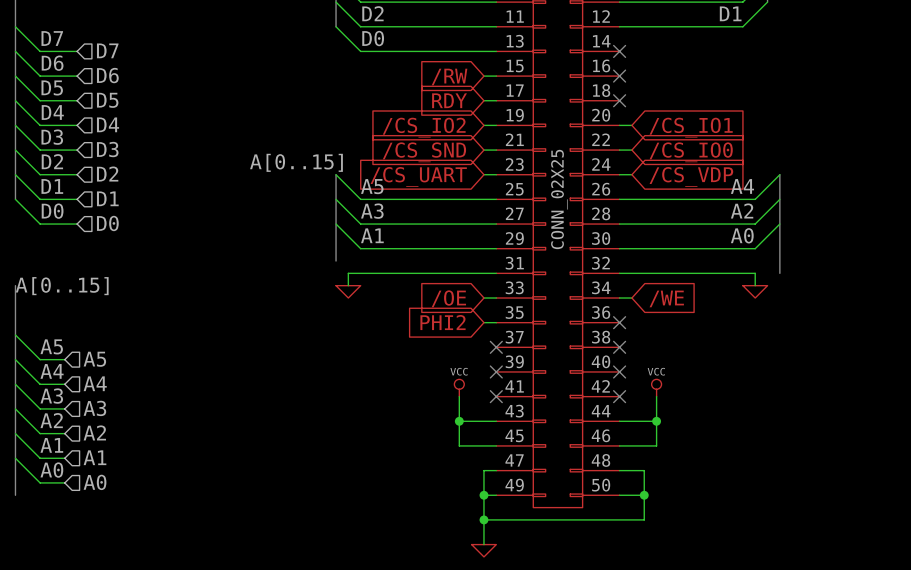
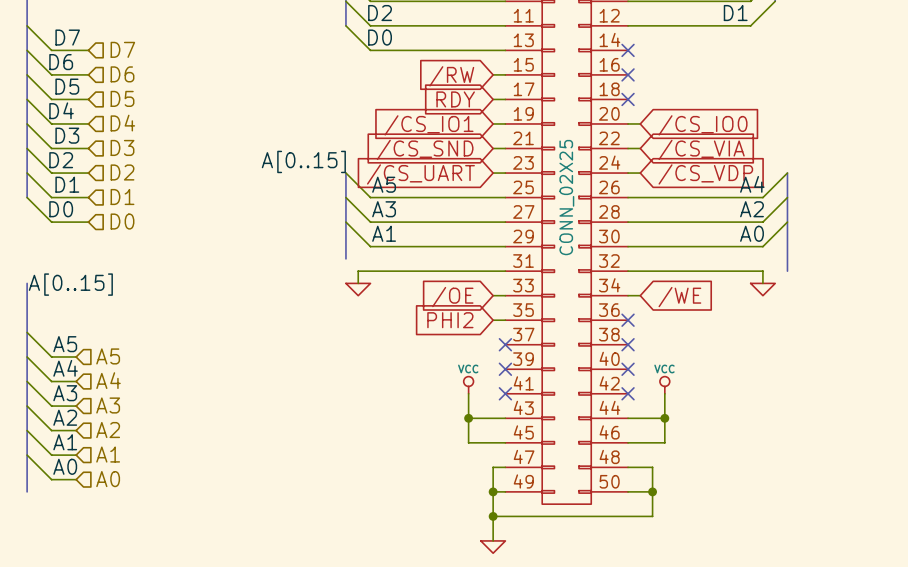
global label: /CS_IO2 (424, 127) -> /CS_IO1 (429, 125)
global label: /CS_IO1 (691, 127) -> /CS_IO0 (703, 125)
global label: /CS_IO0 (691, 152) -> /CS_VIA (701, 149)

